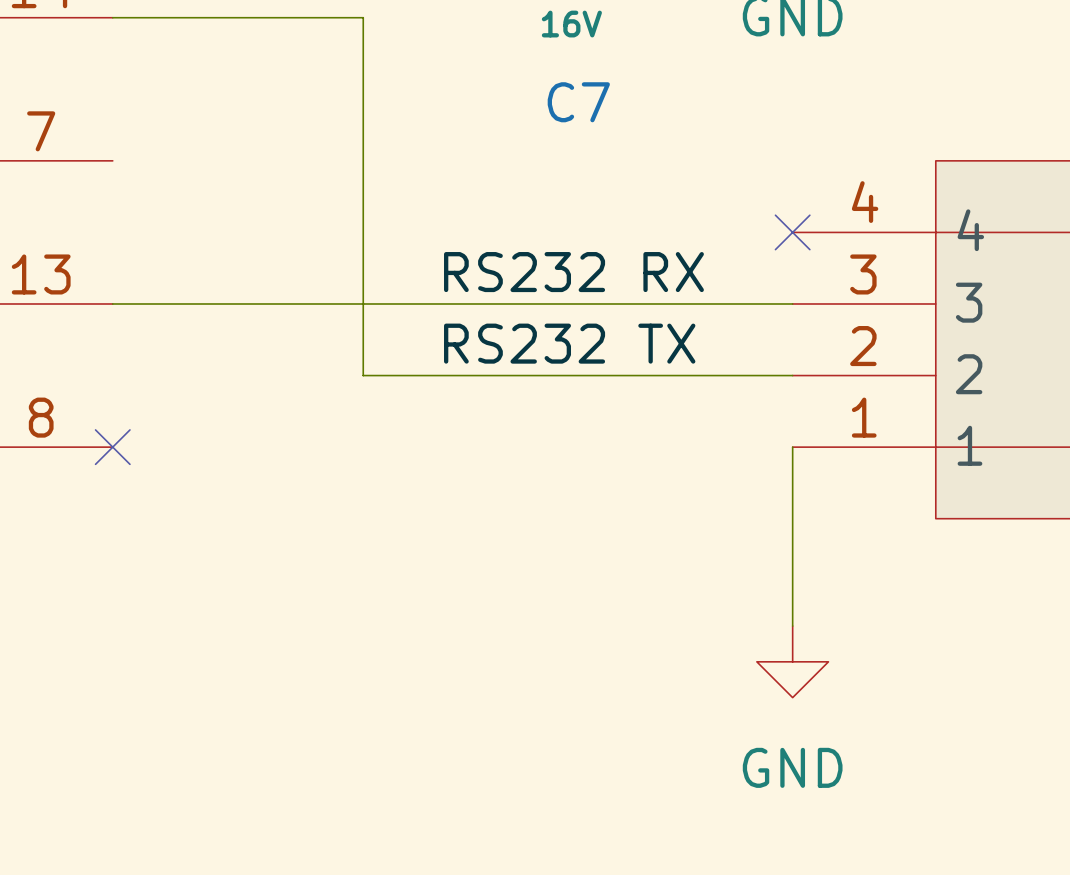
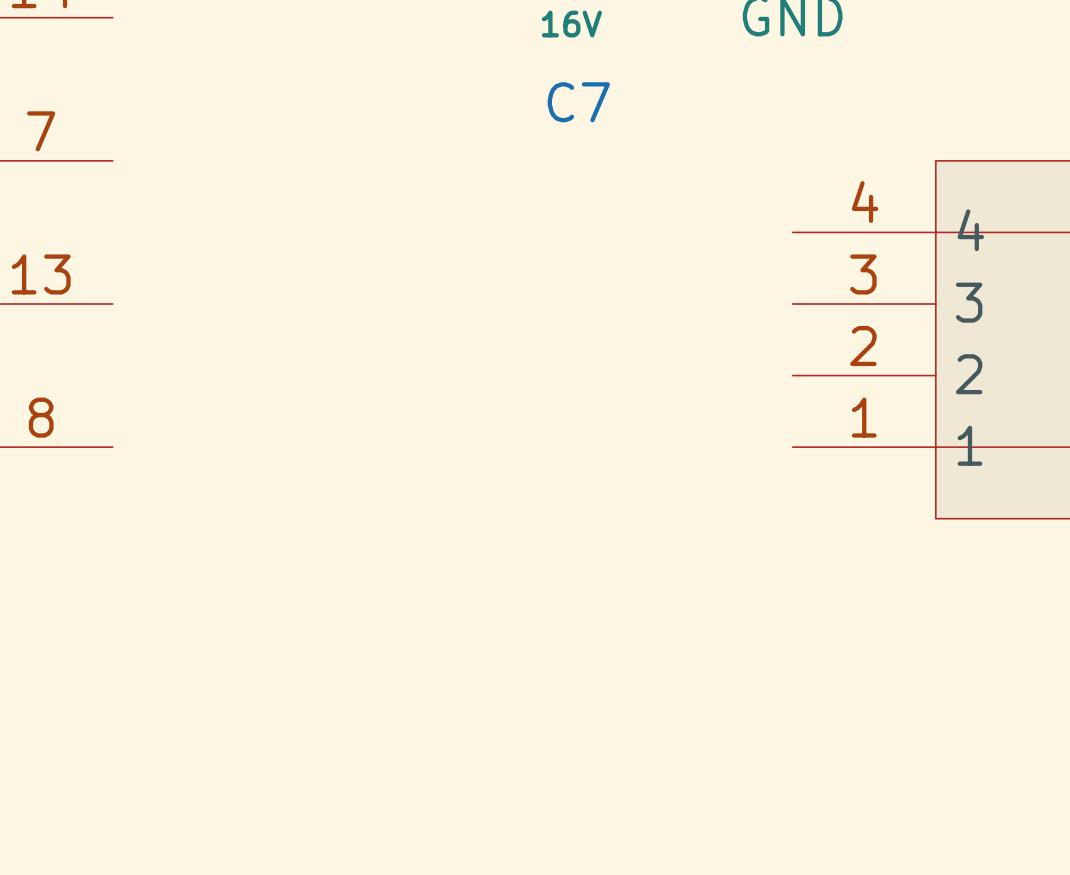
wire: (112, 17) (363, 17) (363, 375) (792, 375) -> none
no-connect mark: (792, 232) -> none
label: RS232 RX (573, 272) -> none
wire: (112, 303) (792, 303) -> none
label: RS232 TX (569, 343) -> none
no-connect mark: (112, 447) -> none
wire: (792, 447) (792, 626) -> none
power symbol: GND (792, 661) -> none

